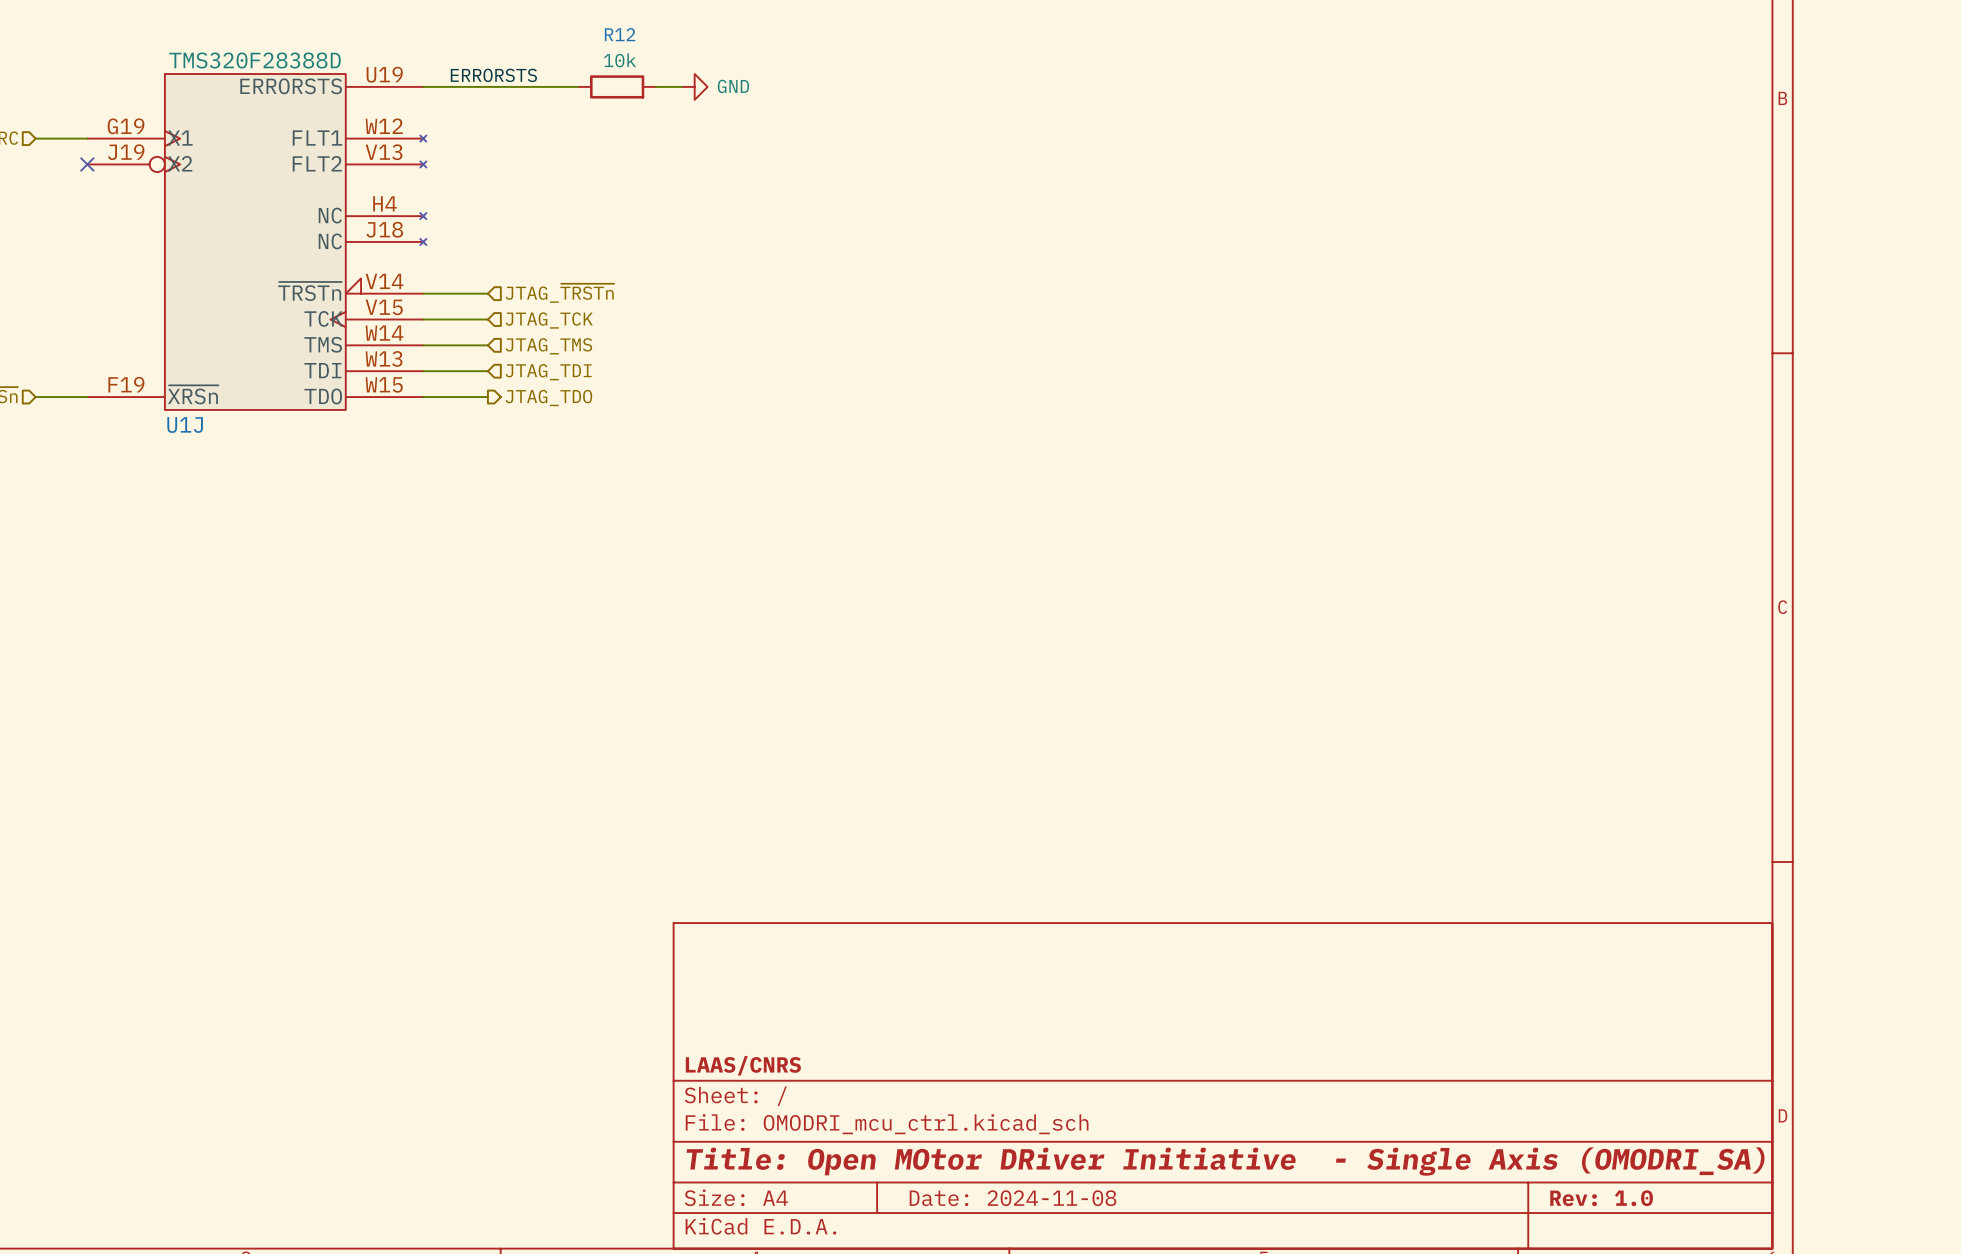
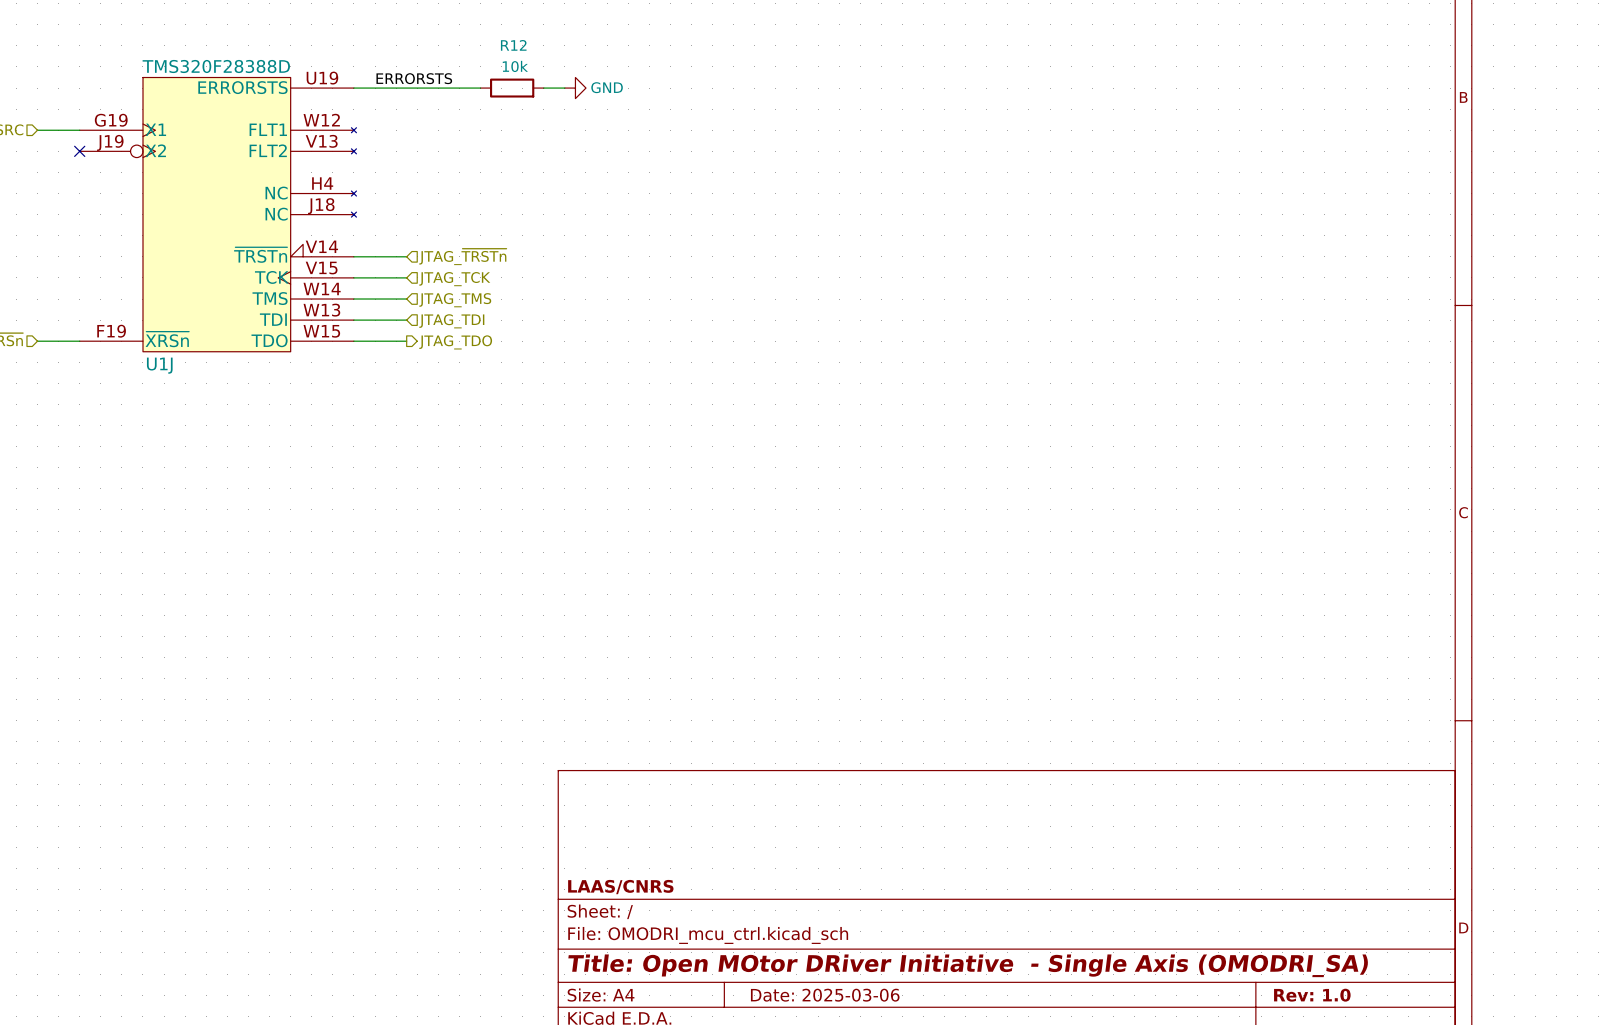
title block: Date: 2024-11-08 (1013, 1198) -> Date: 2025-03-06 (825, 995)

